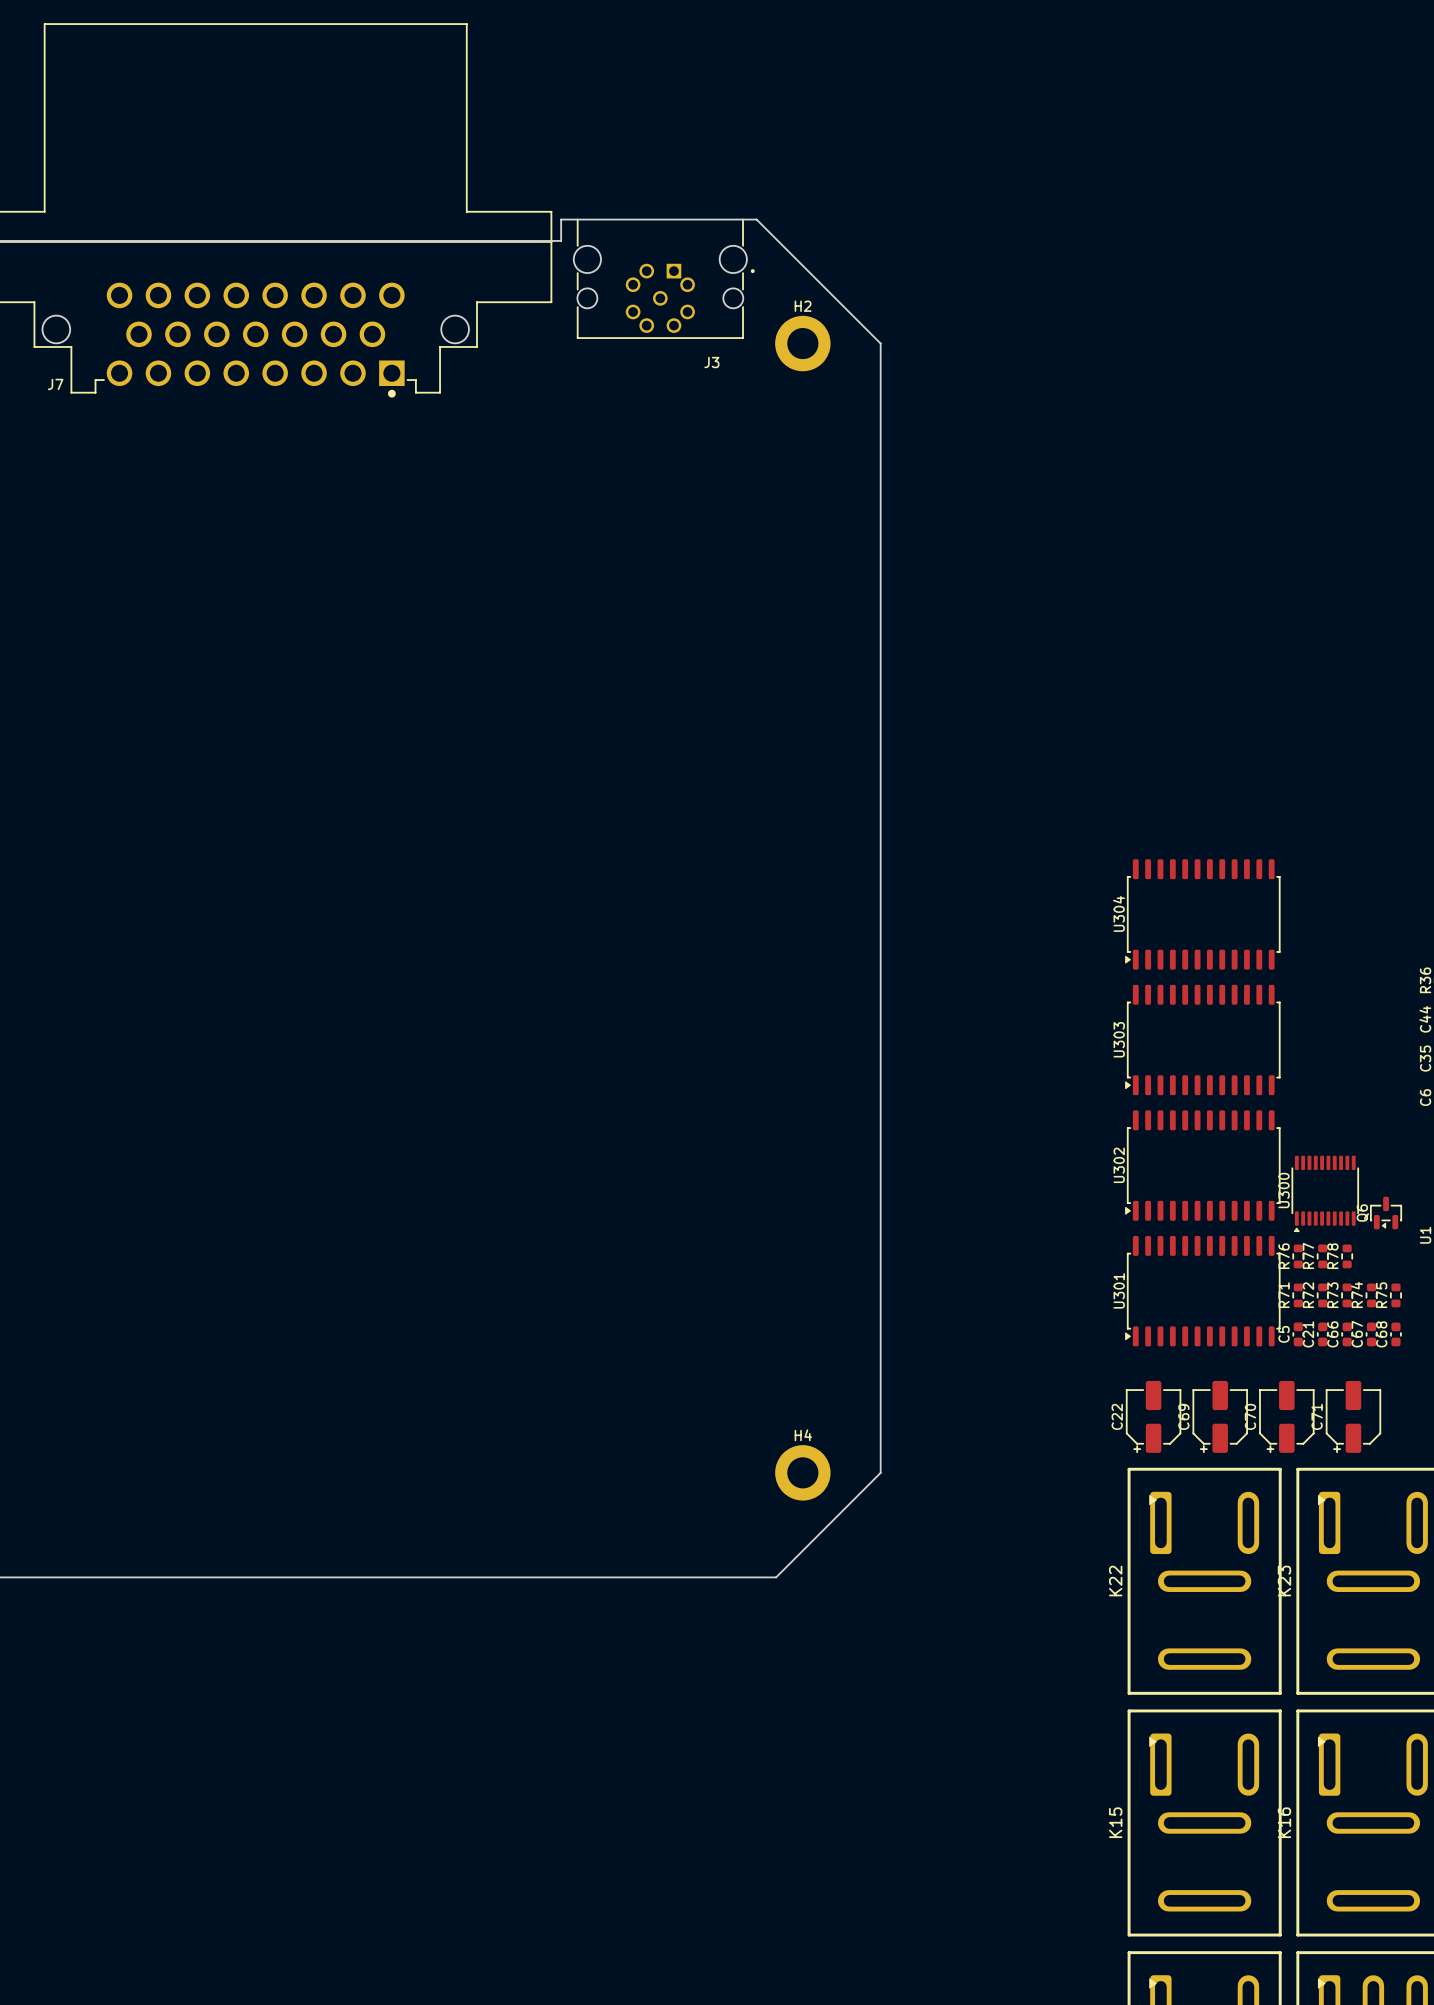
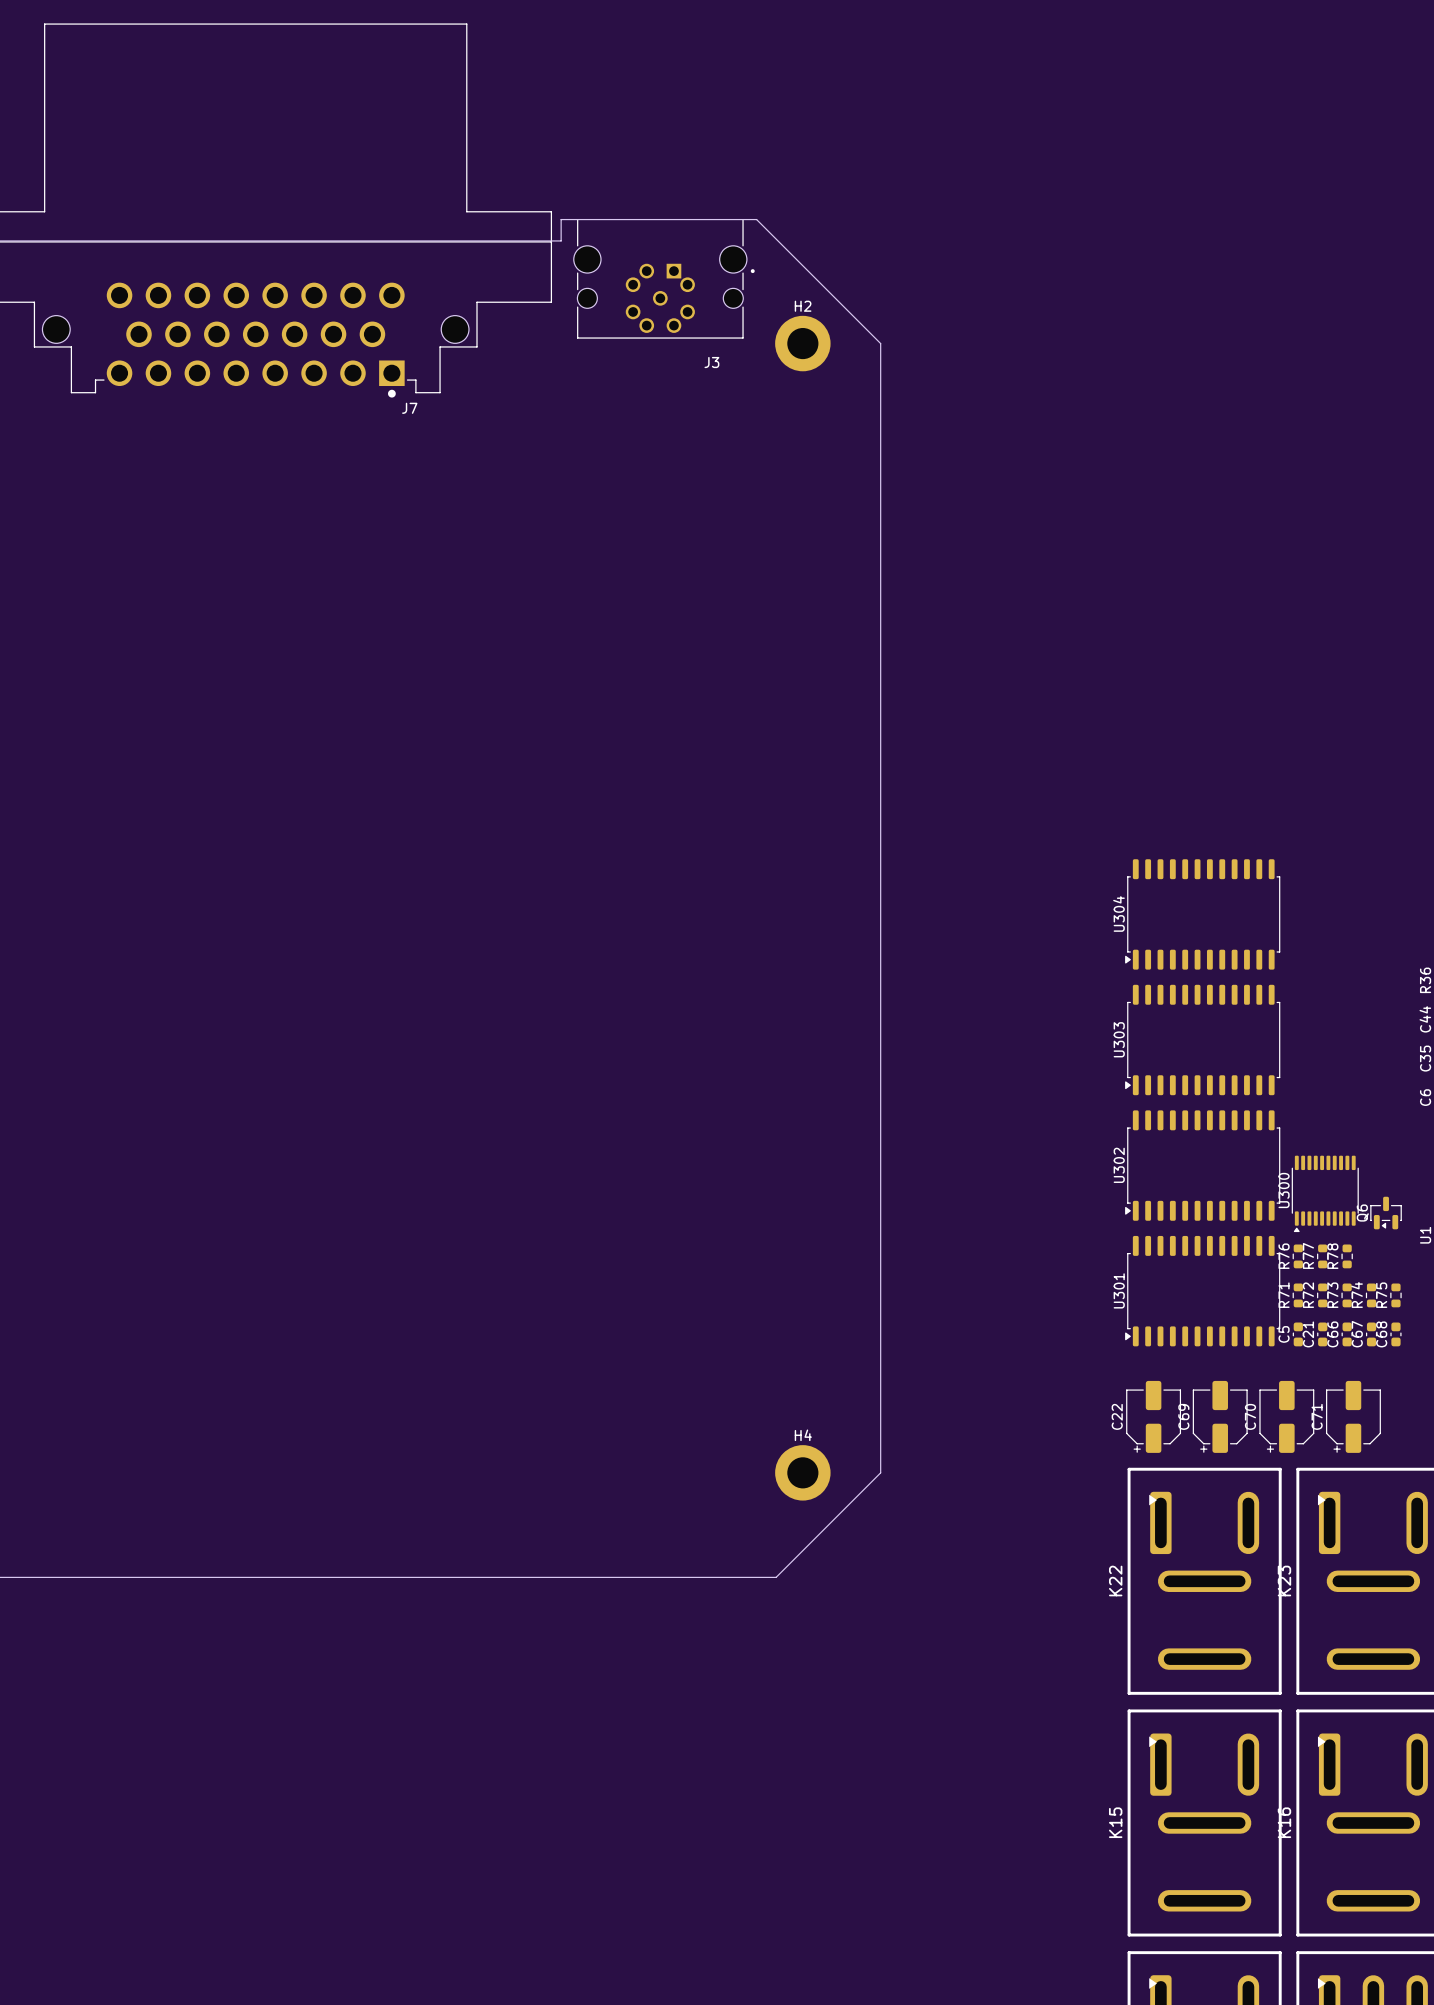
J7 name position: J7 (55, 384) -> J7 (409, 408)

